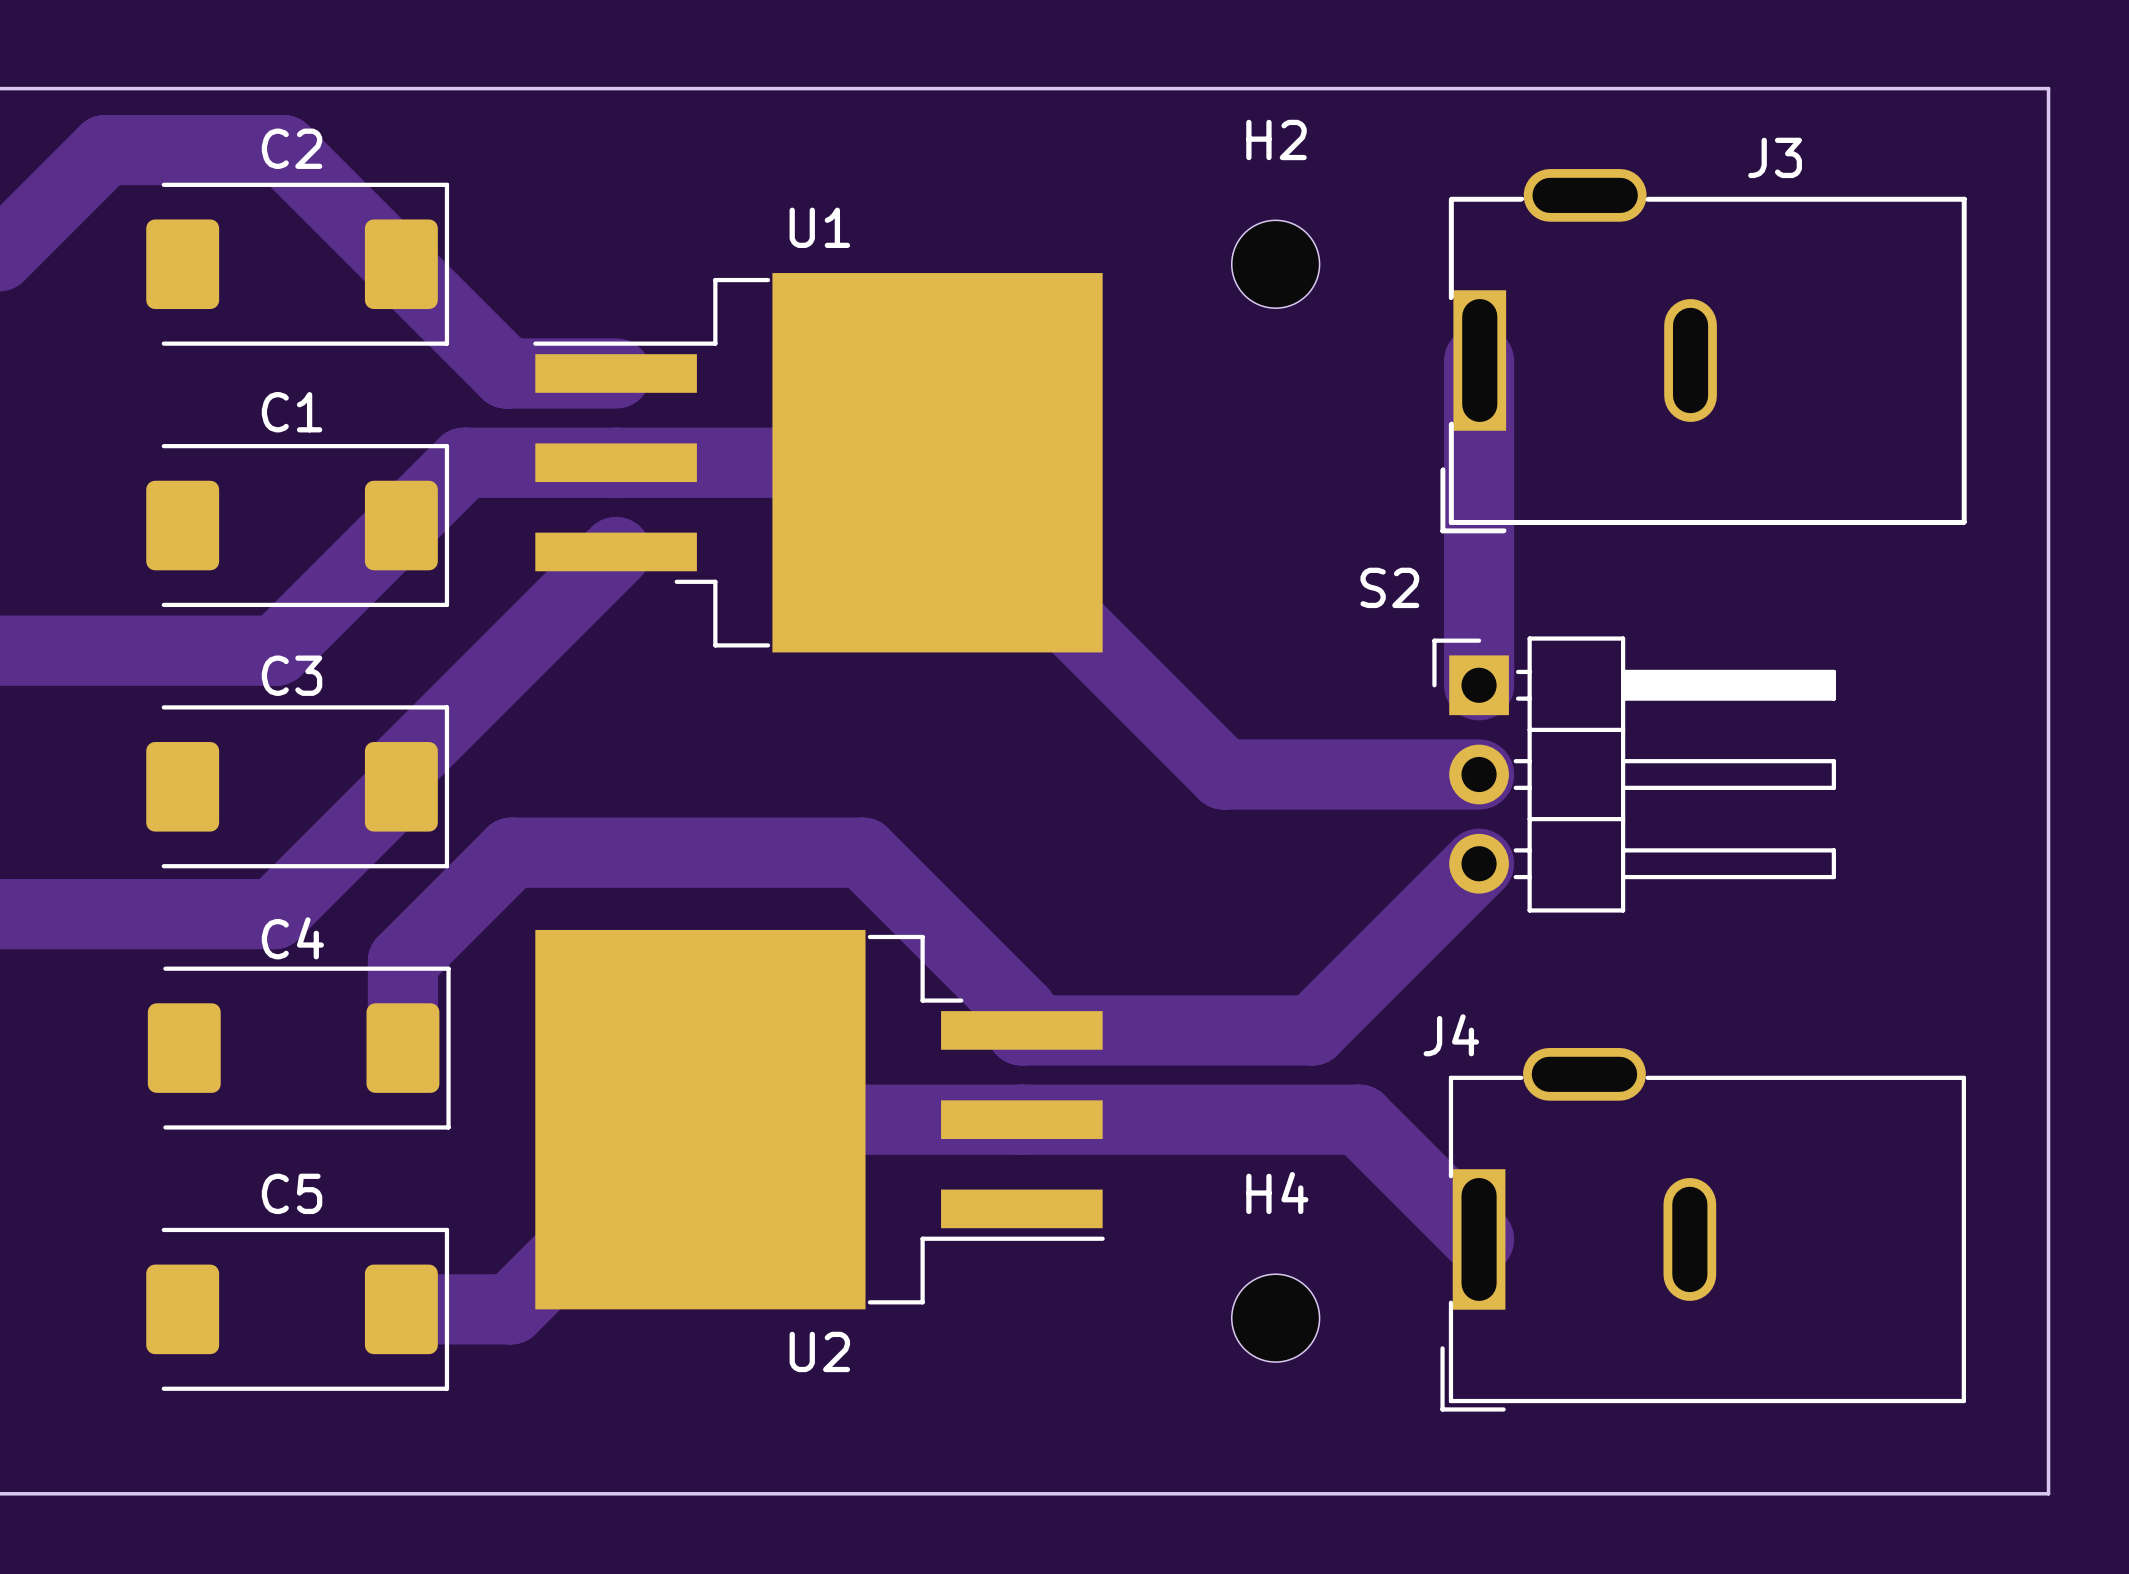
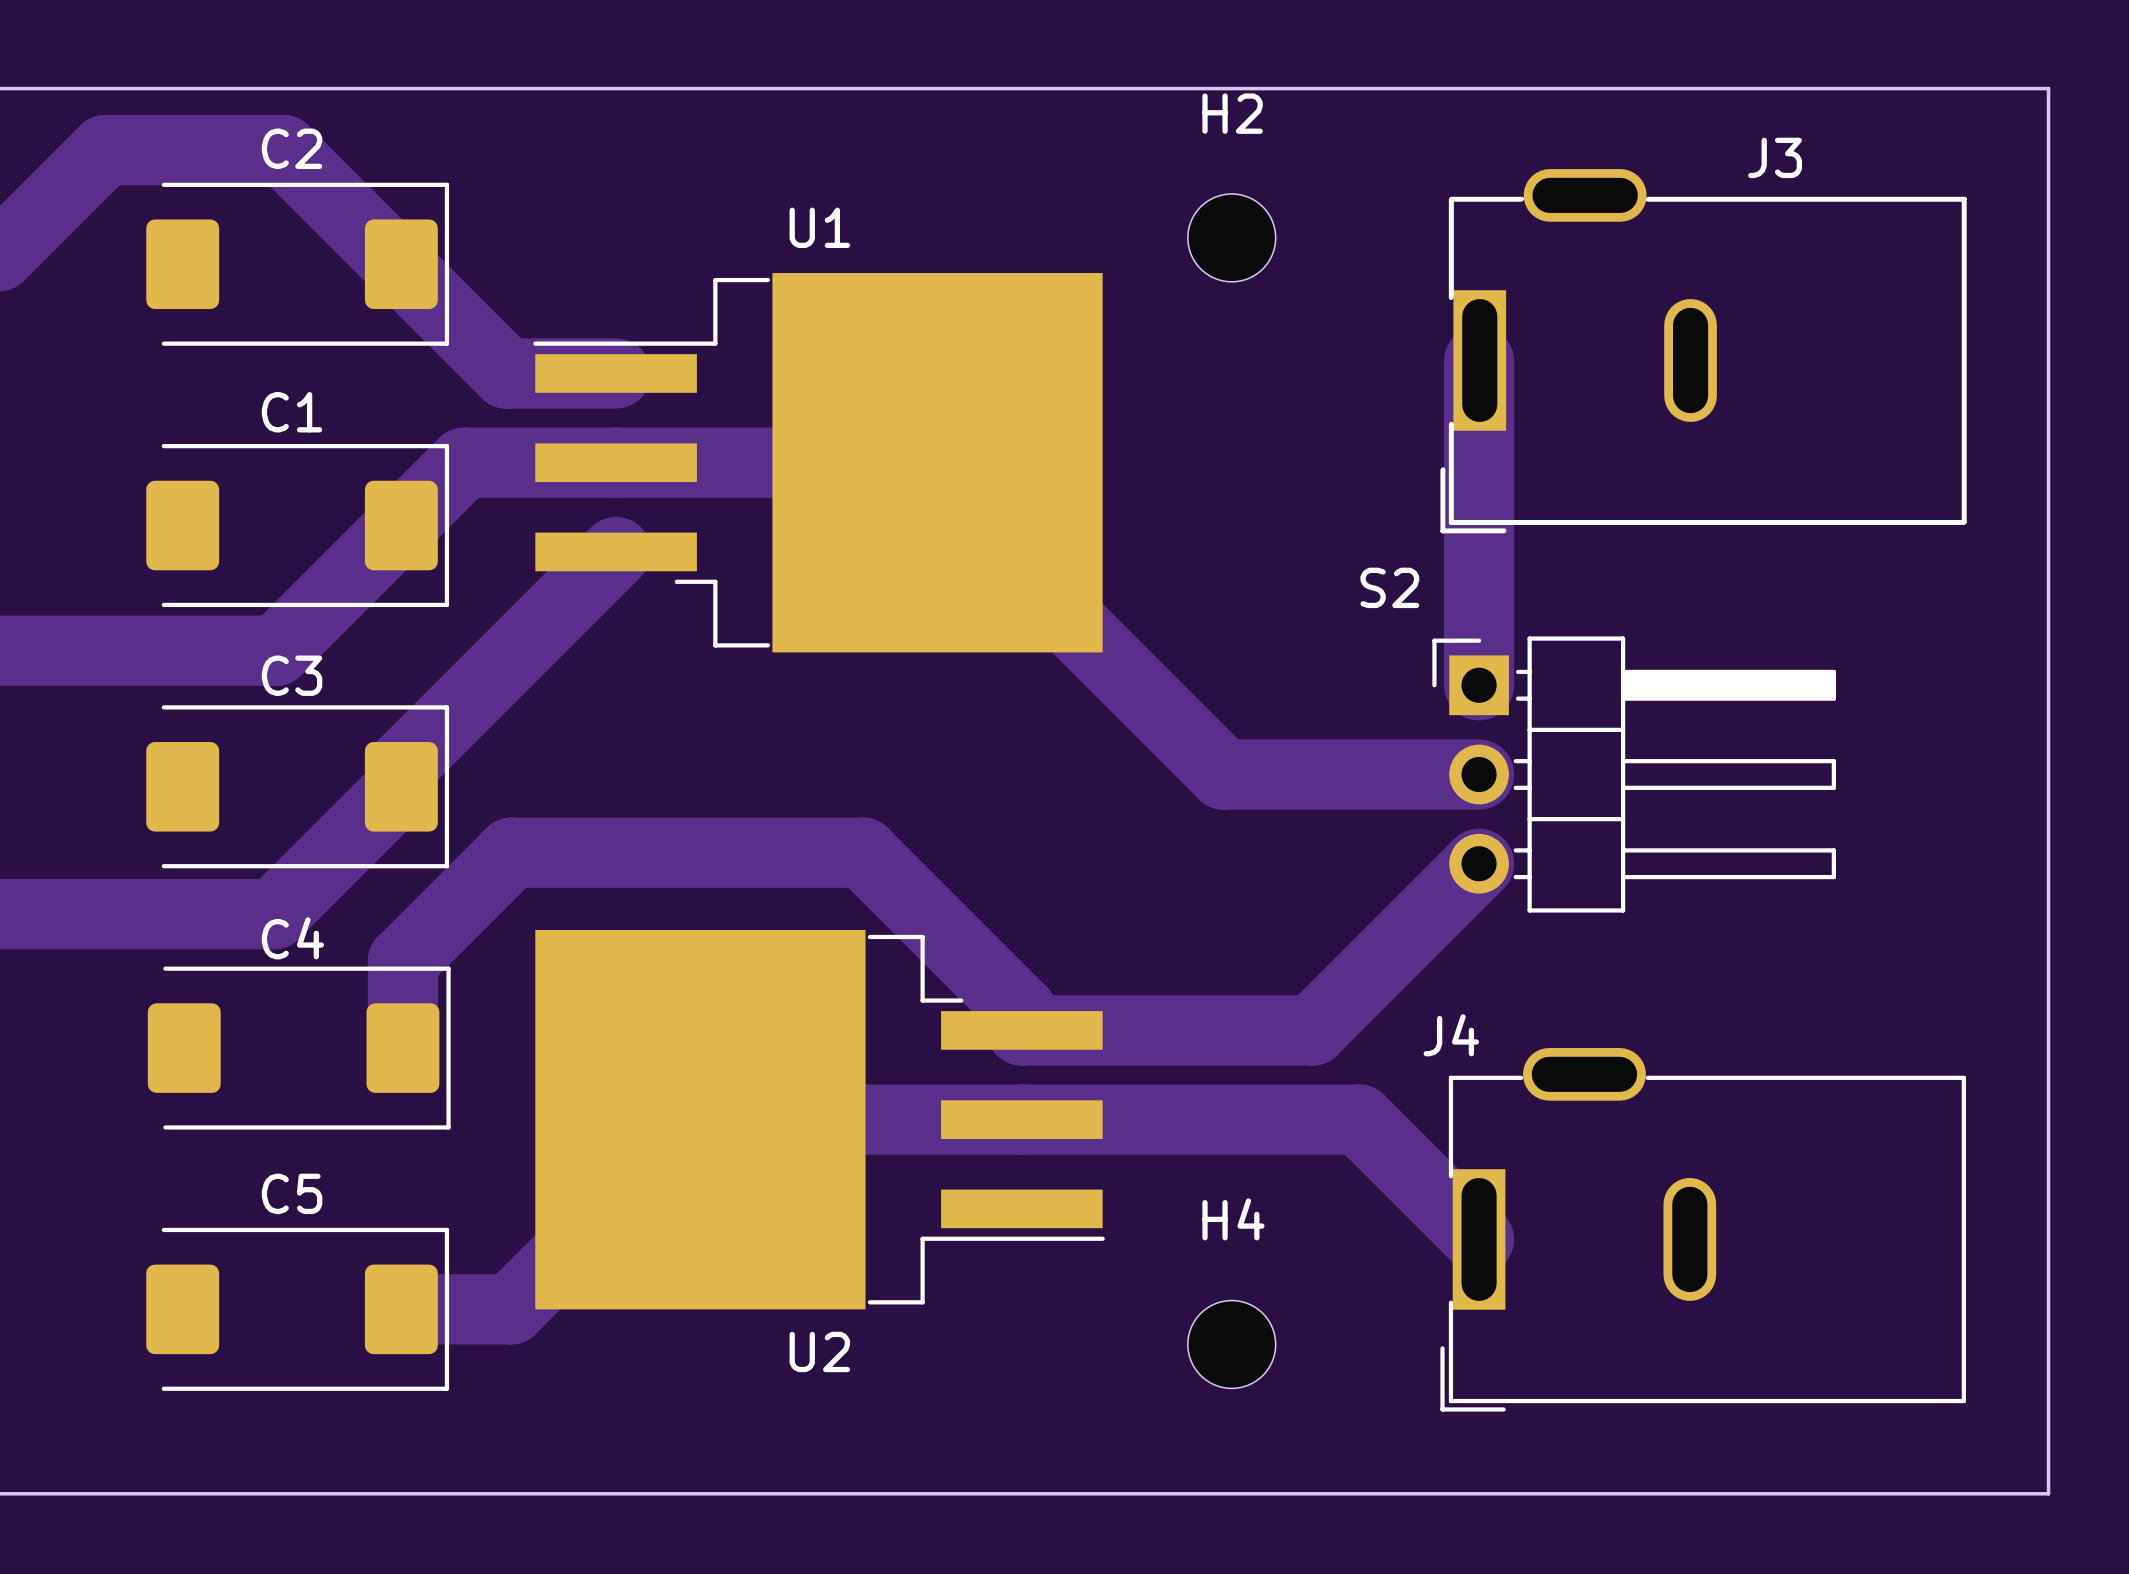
H2 position: (1275, 264) -> (1231, 237)
H4 position: (1275, 1318) -> (1231, 1344)

